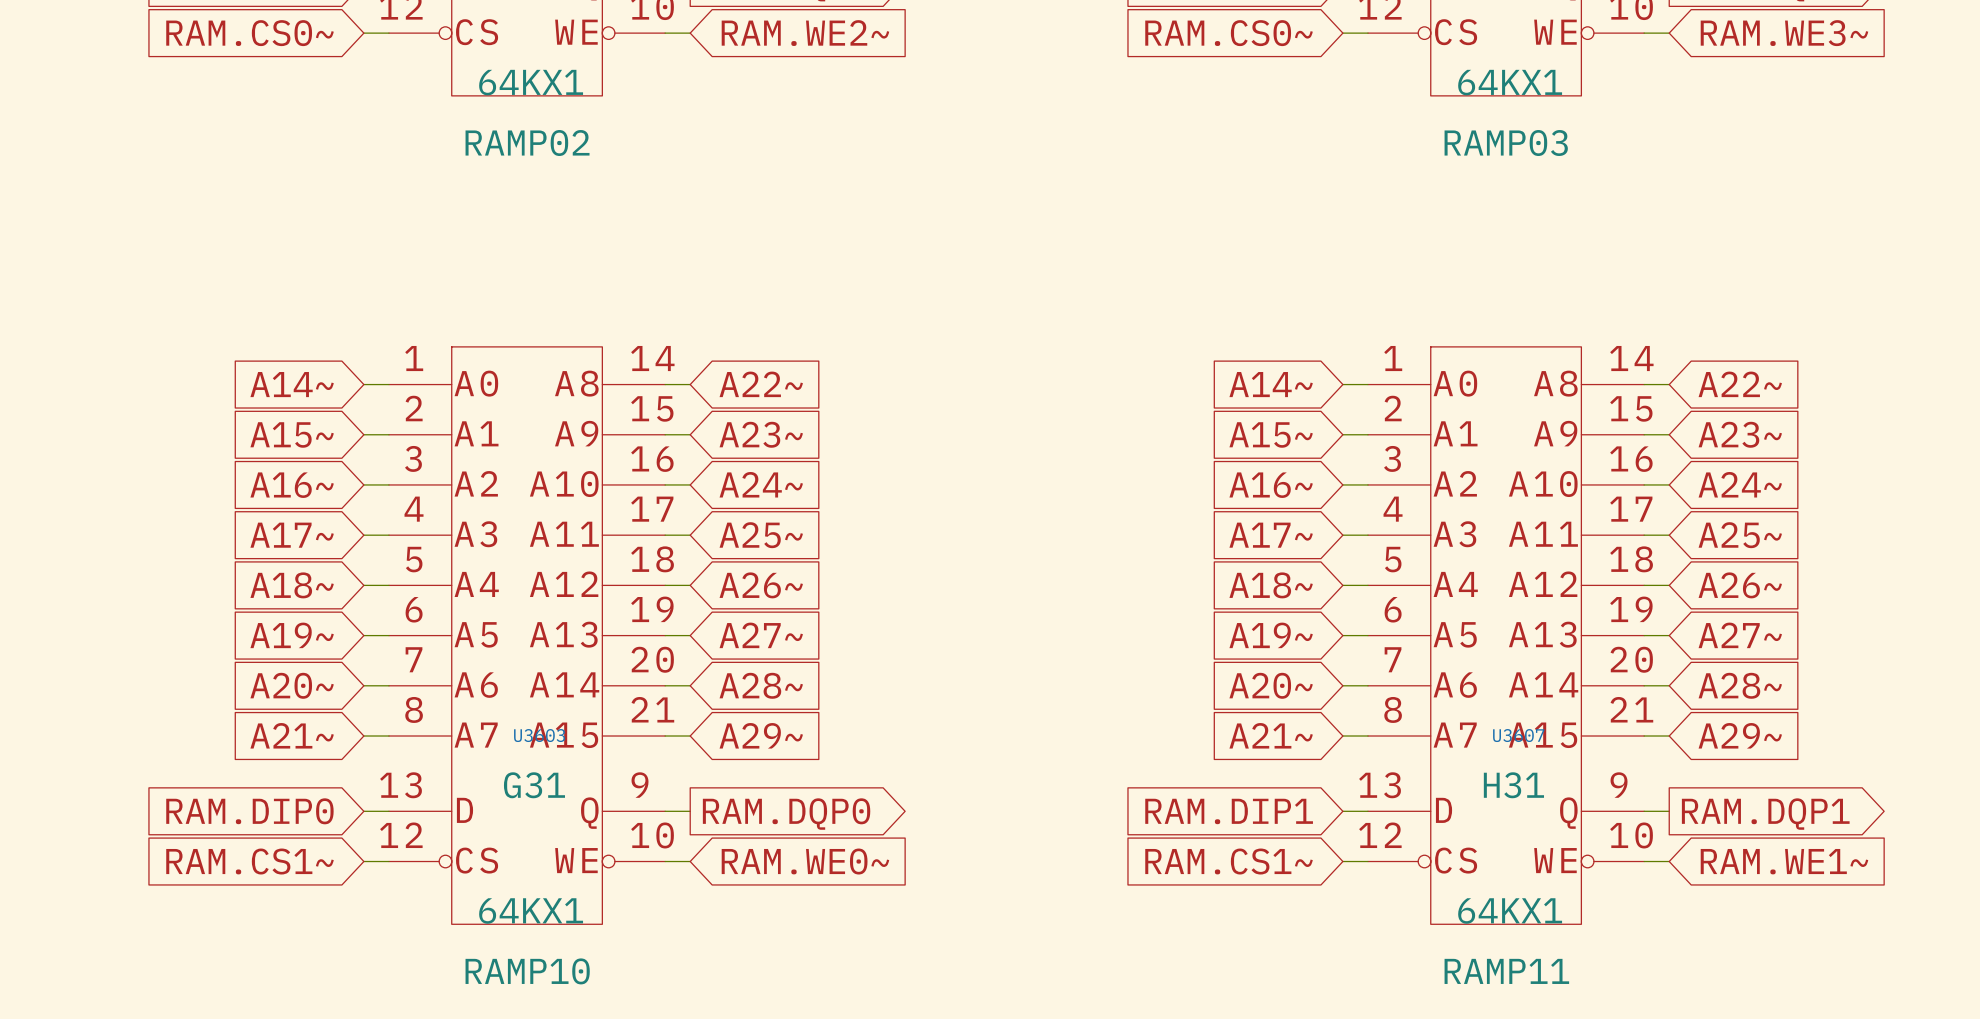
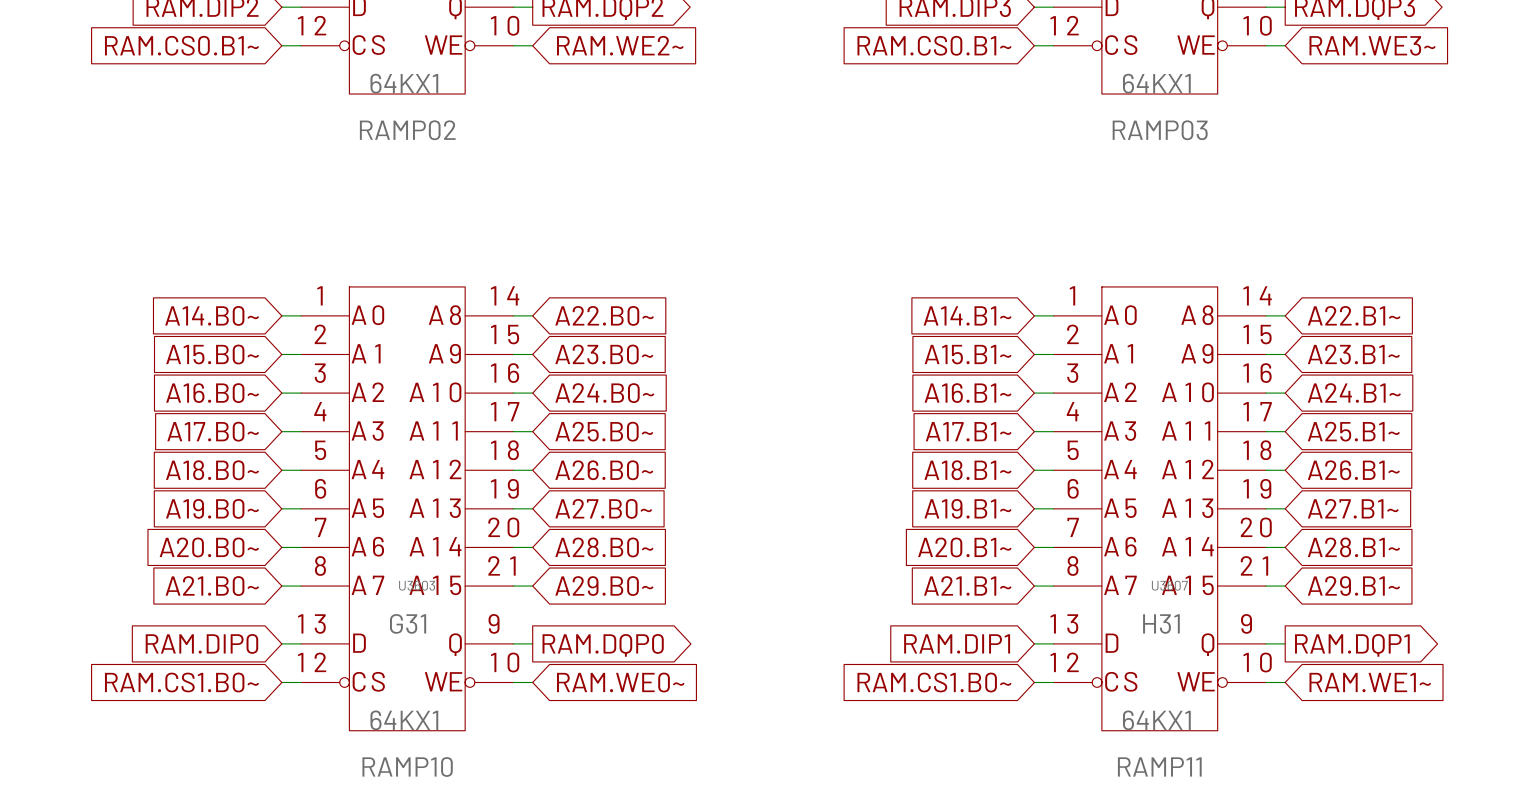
global label: RAM.CS0~ (250, 33) -> RAM.CS0.B1~ (182, 45)
global label: RAM.CS0~ (1229, 33) -> RAM.CS0.B1~ (934, 45)
global label: A14~ (292, 384) -> A14.B0~ (212, 315)
global label: A22~ (761, 384) -> A22.B0~ (604, 315)
global label: A14~ (1271, 384) -> A14.B1~ (967, 315)
global label: A22~ (1740, 384) -> A22.B1~ (1354, 315)
global label: A15~ (292, 434) -> A15.B0~ (212, 354)
global label: A23~ (761, 434) -> A23.B0~ (604, 354)
global label: A15~ (1271, 434) -> A15.B1~ (968, 354)
global label: A23~ (1740, 434) -> A23.B1~ (1353, 354)
global label: A24~ (761, 484) -> A24.B0~ (604, 393)
global label: A24~ (1740, 484) -> A24.B1~ (1354, 392)
global label: A16~ (292, 485) -> A16.B0~ (212, 393)
global label: A16~ (1271, 485) -> A16.B1~ (968, 393)
global label: A17~ (292, 535) -> A17.B0~ (213, 431)
global label: A25~ (761, 535) -> A25.B0~ (604, 431)
global label: A17~ (1271, 535) -> A17.B1~ (968, 431)
global label: A25~ (1740, 535) -> A25.B1~ (1353, 431)
global label: A18~ (292, 585) -> A18.B0~ (212, 470)
global label: A26~ (761, 585) -> A26.B0~ (604, 470)
global label: A18~ (1271, 585) -> A18.B1~ (968, 470)
global label: A26~ (1740, 585) -> A26.B1~ (1353, 470)
global label: A19~ (292, 635) -> A19.B0~ (212, 508)
global label: A27~ (761, 635) -> A27.B0~ (603, 508)
global label: A19~ (1271, 635) -> A19.B1~ (968, 508)
global label: A27~ (1740, 635) -> A27.B1~ (1353, 508)
global label: A20~ (292, 685) -> A20.B0~ (209, 547)
global label: A28~ (761, 685) -> A28.B0~ (604, 547)
global label: A20~ (1271, 685) -> A20.B1~ (964, 547)
global label: A28~ (1740, 685) -> A28.B1~ (1353, 547)
global label: A21~ (292, 735) -> A21.B0~ (212, 586)
global label: A29~ (761, 735) -> A29.B0~ (604, 586)
global label: A21~ (1271, 735) -> A21.B1~ (967, 585)
global label: A29~ (1740, 735) -> A29.B1~ (1353, 586)
global label: RAM.CS1~ (250, 861) -> RAM.CS1.B0~ (182, 682)
global label: RAM.CS1~ (1229, 861) -> RAM.CS1.B0~ (934, 682)

